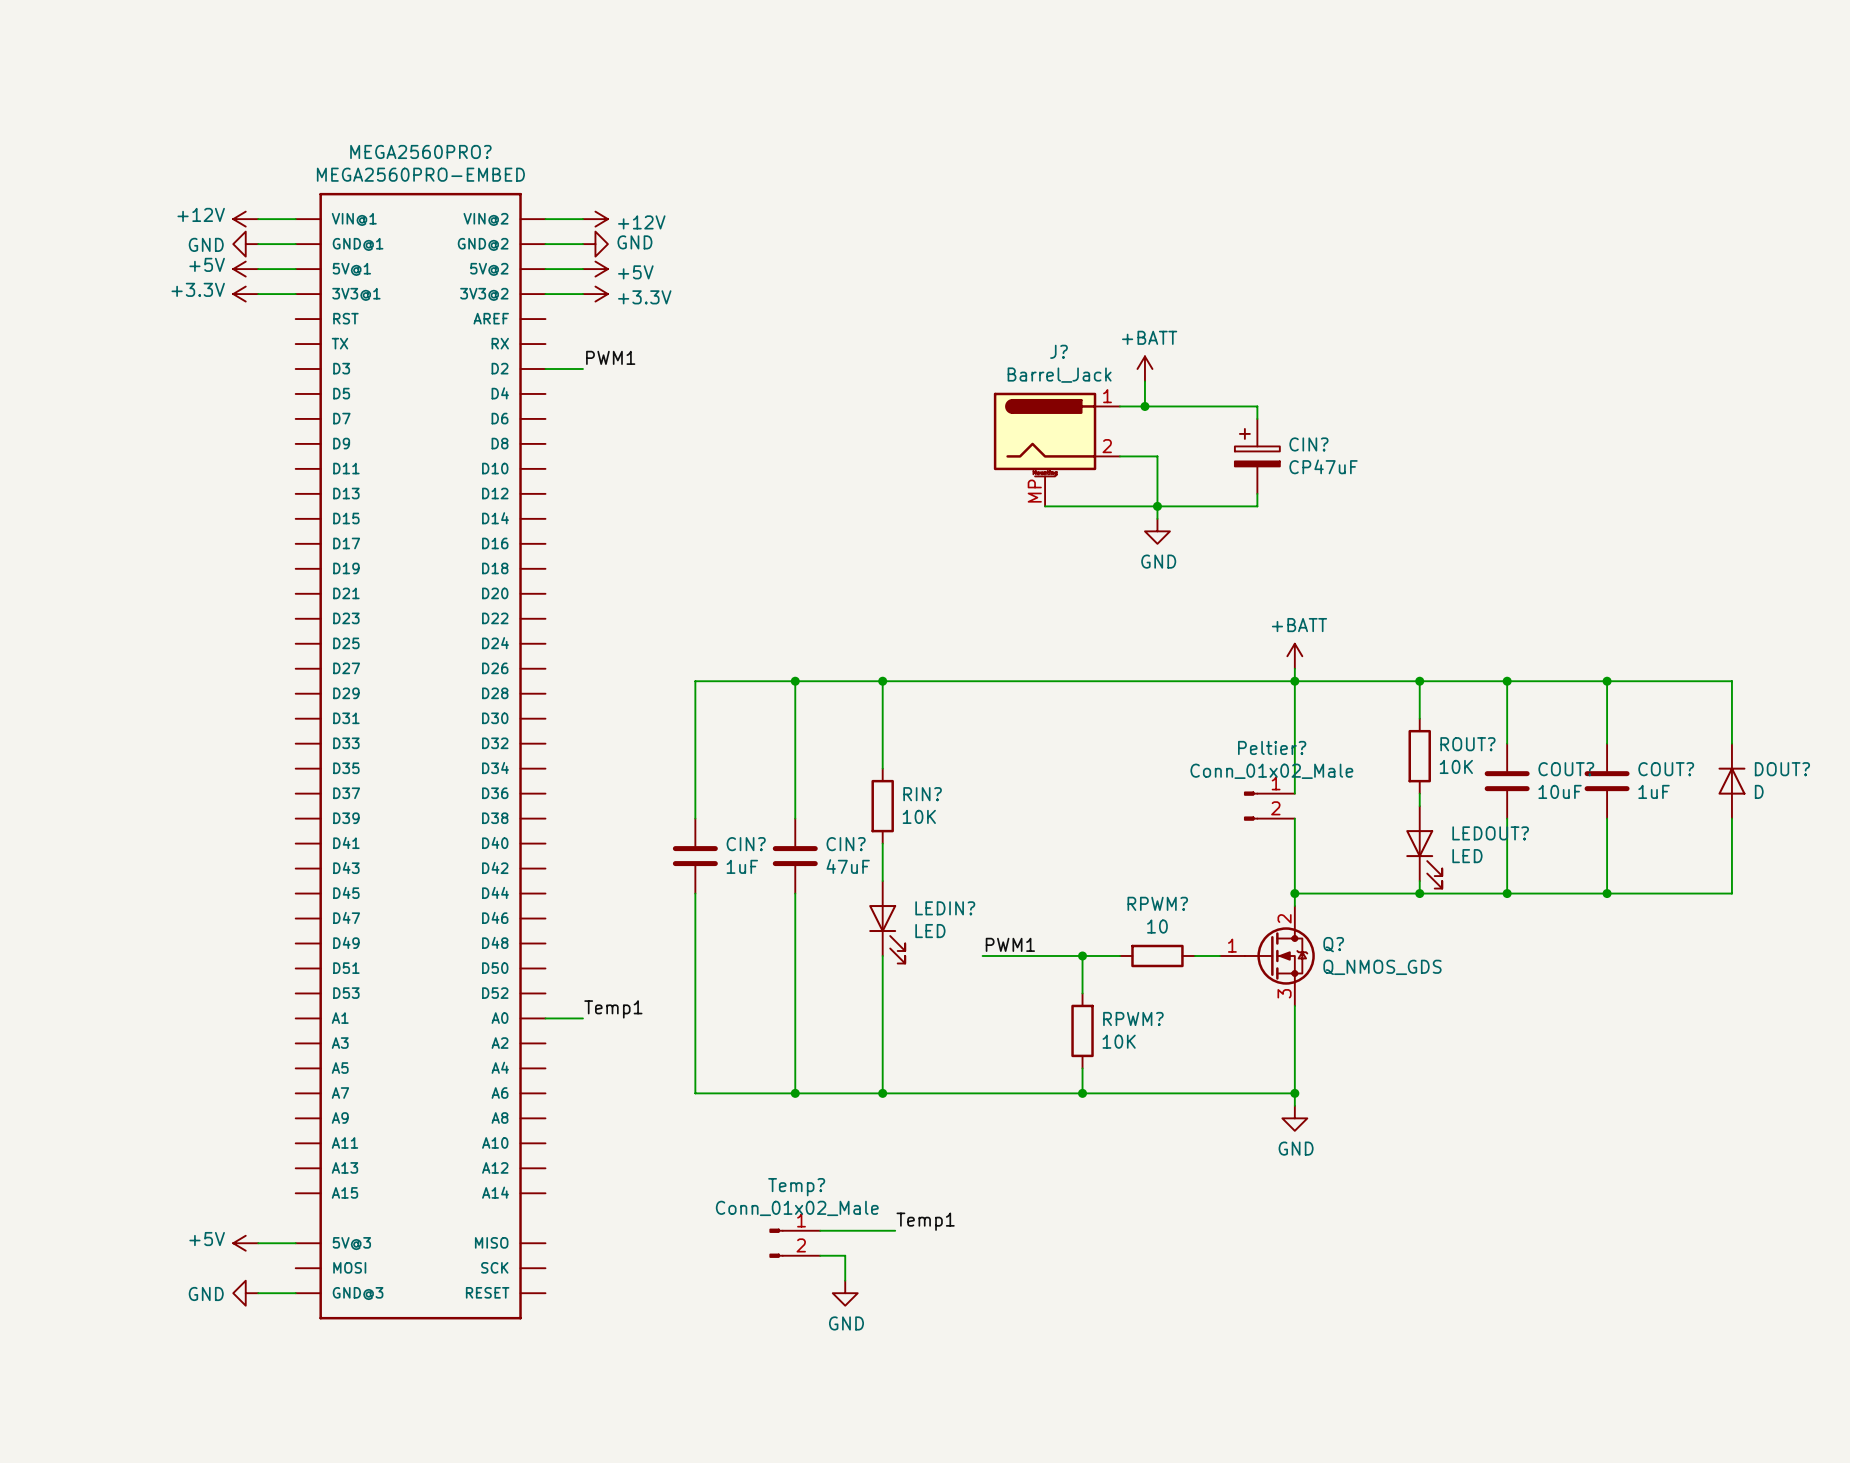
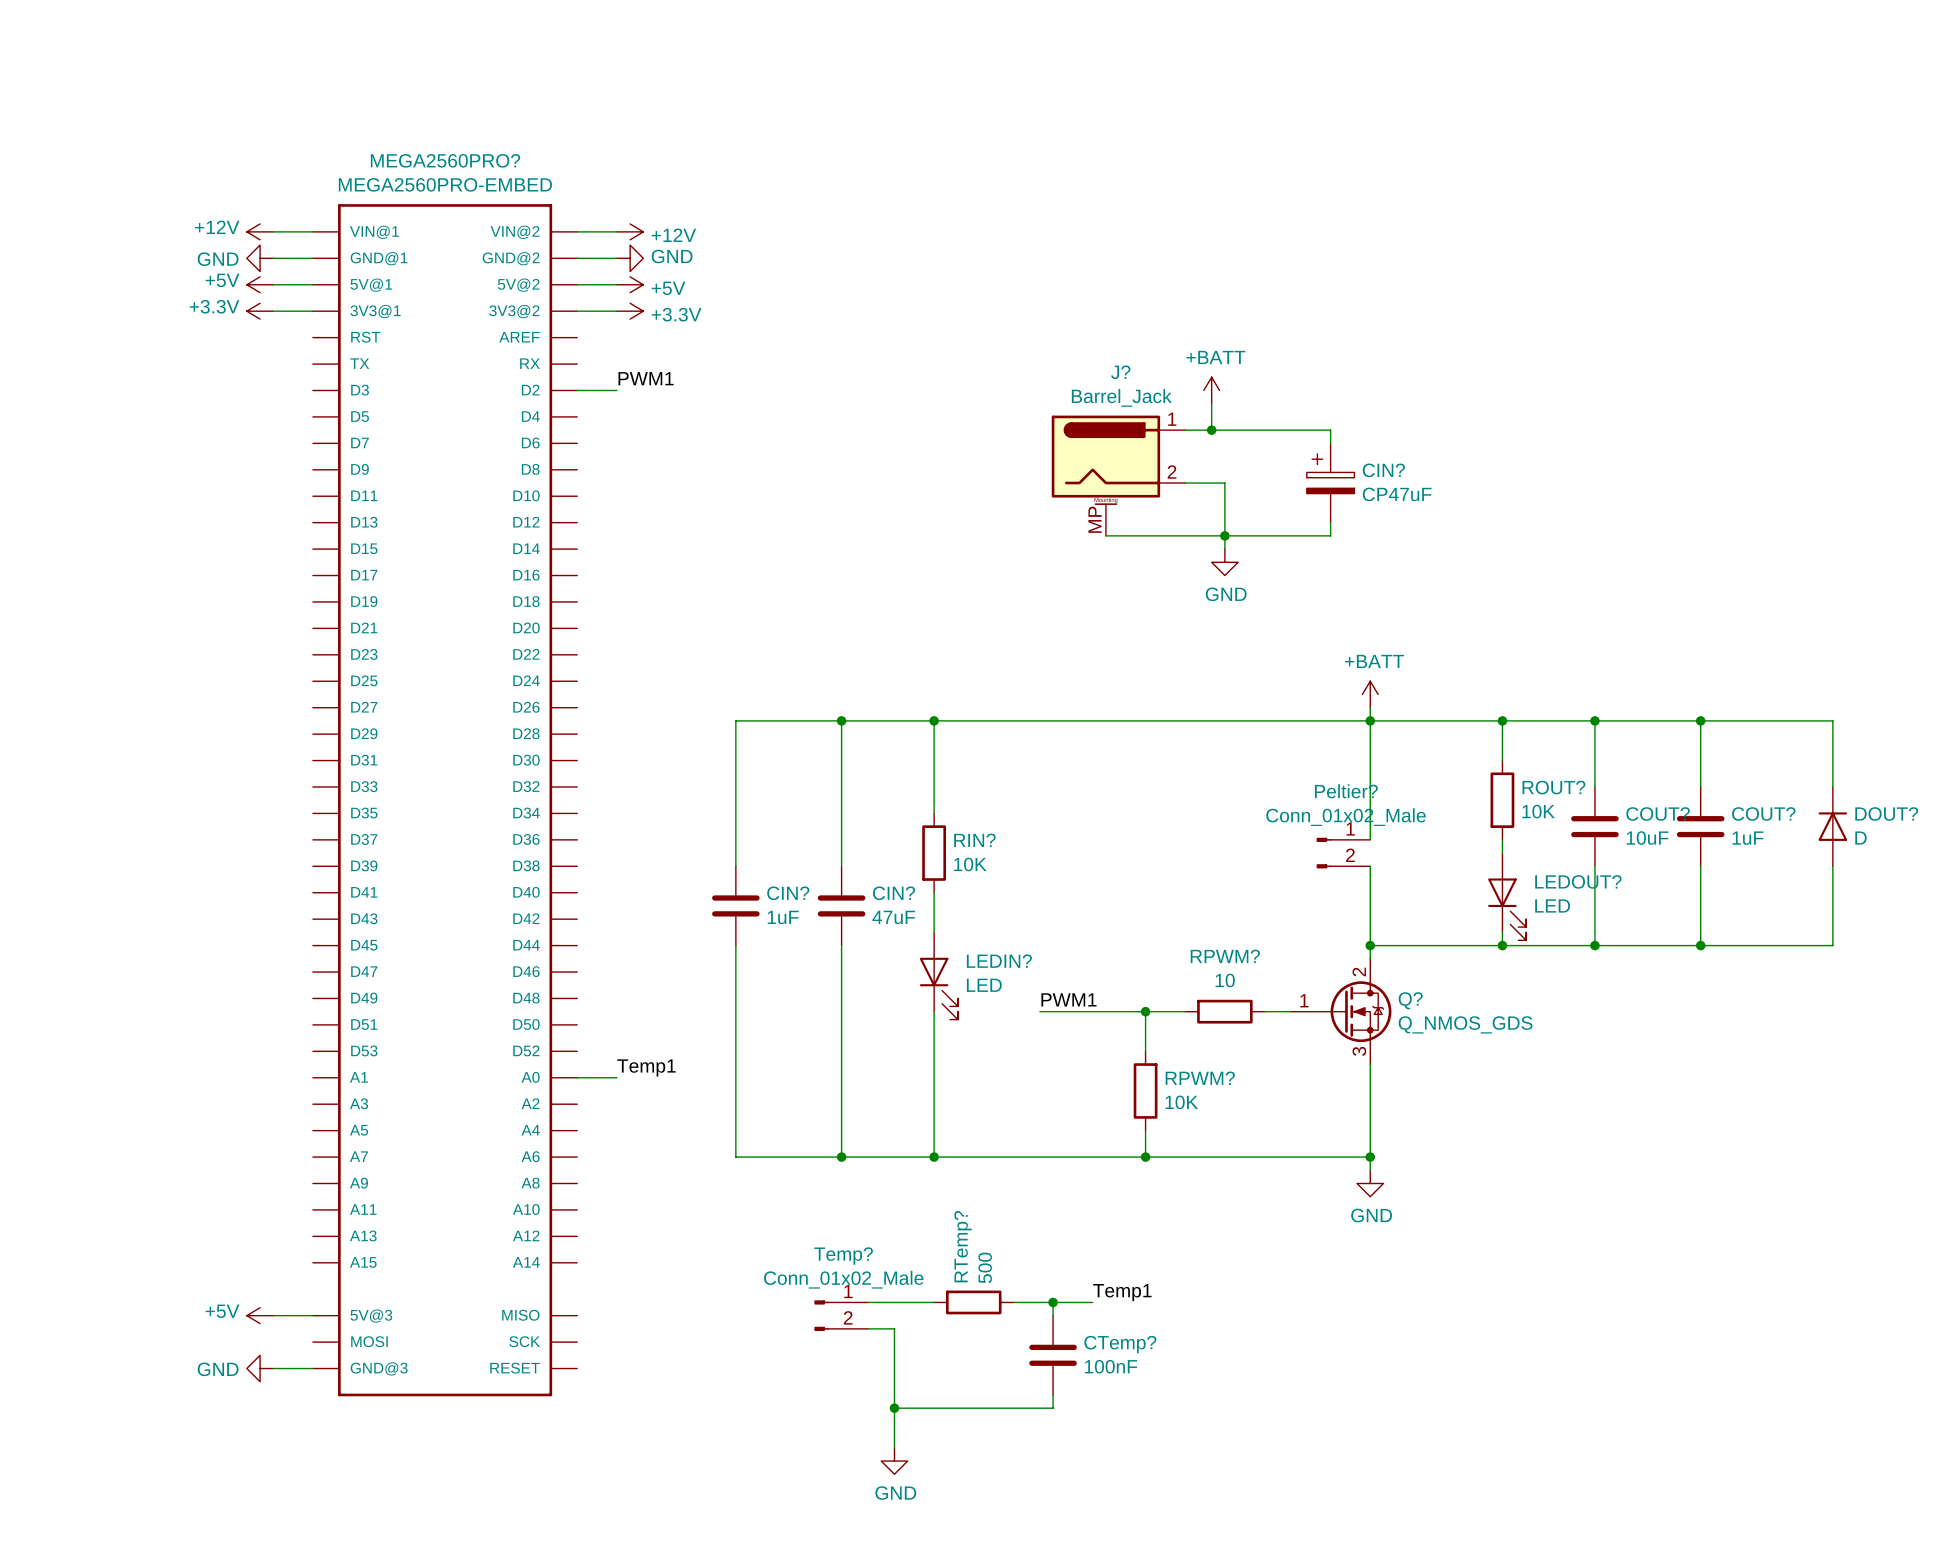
label position: Temp1 (925, 1221) -> Temp1 (1122, 1292)
RTemp?: none -> 500 (973, 1302)
wire: none -> (1013, 1302) (1092, 1302)
wire: none -> (1053, 1302) (1053, 1315)
junction: none -> (1053, 1302)
wire: none -> (894, 1355) (894, 1447)
CTemp?: none -> 100nF (1053, 1355)
power symbol position: GND (845, 1293) -> GND (894, 1461)
wire: none -> (1053, 1394) (1053, 1408) (894, 1408)
junction: none -> (894, 1408)

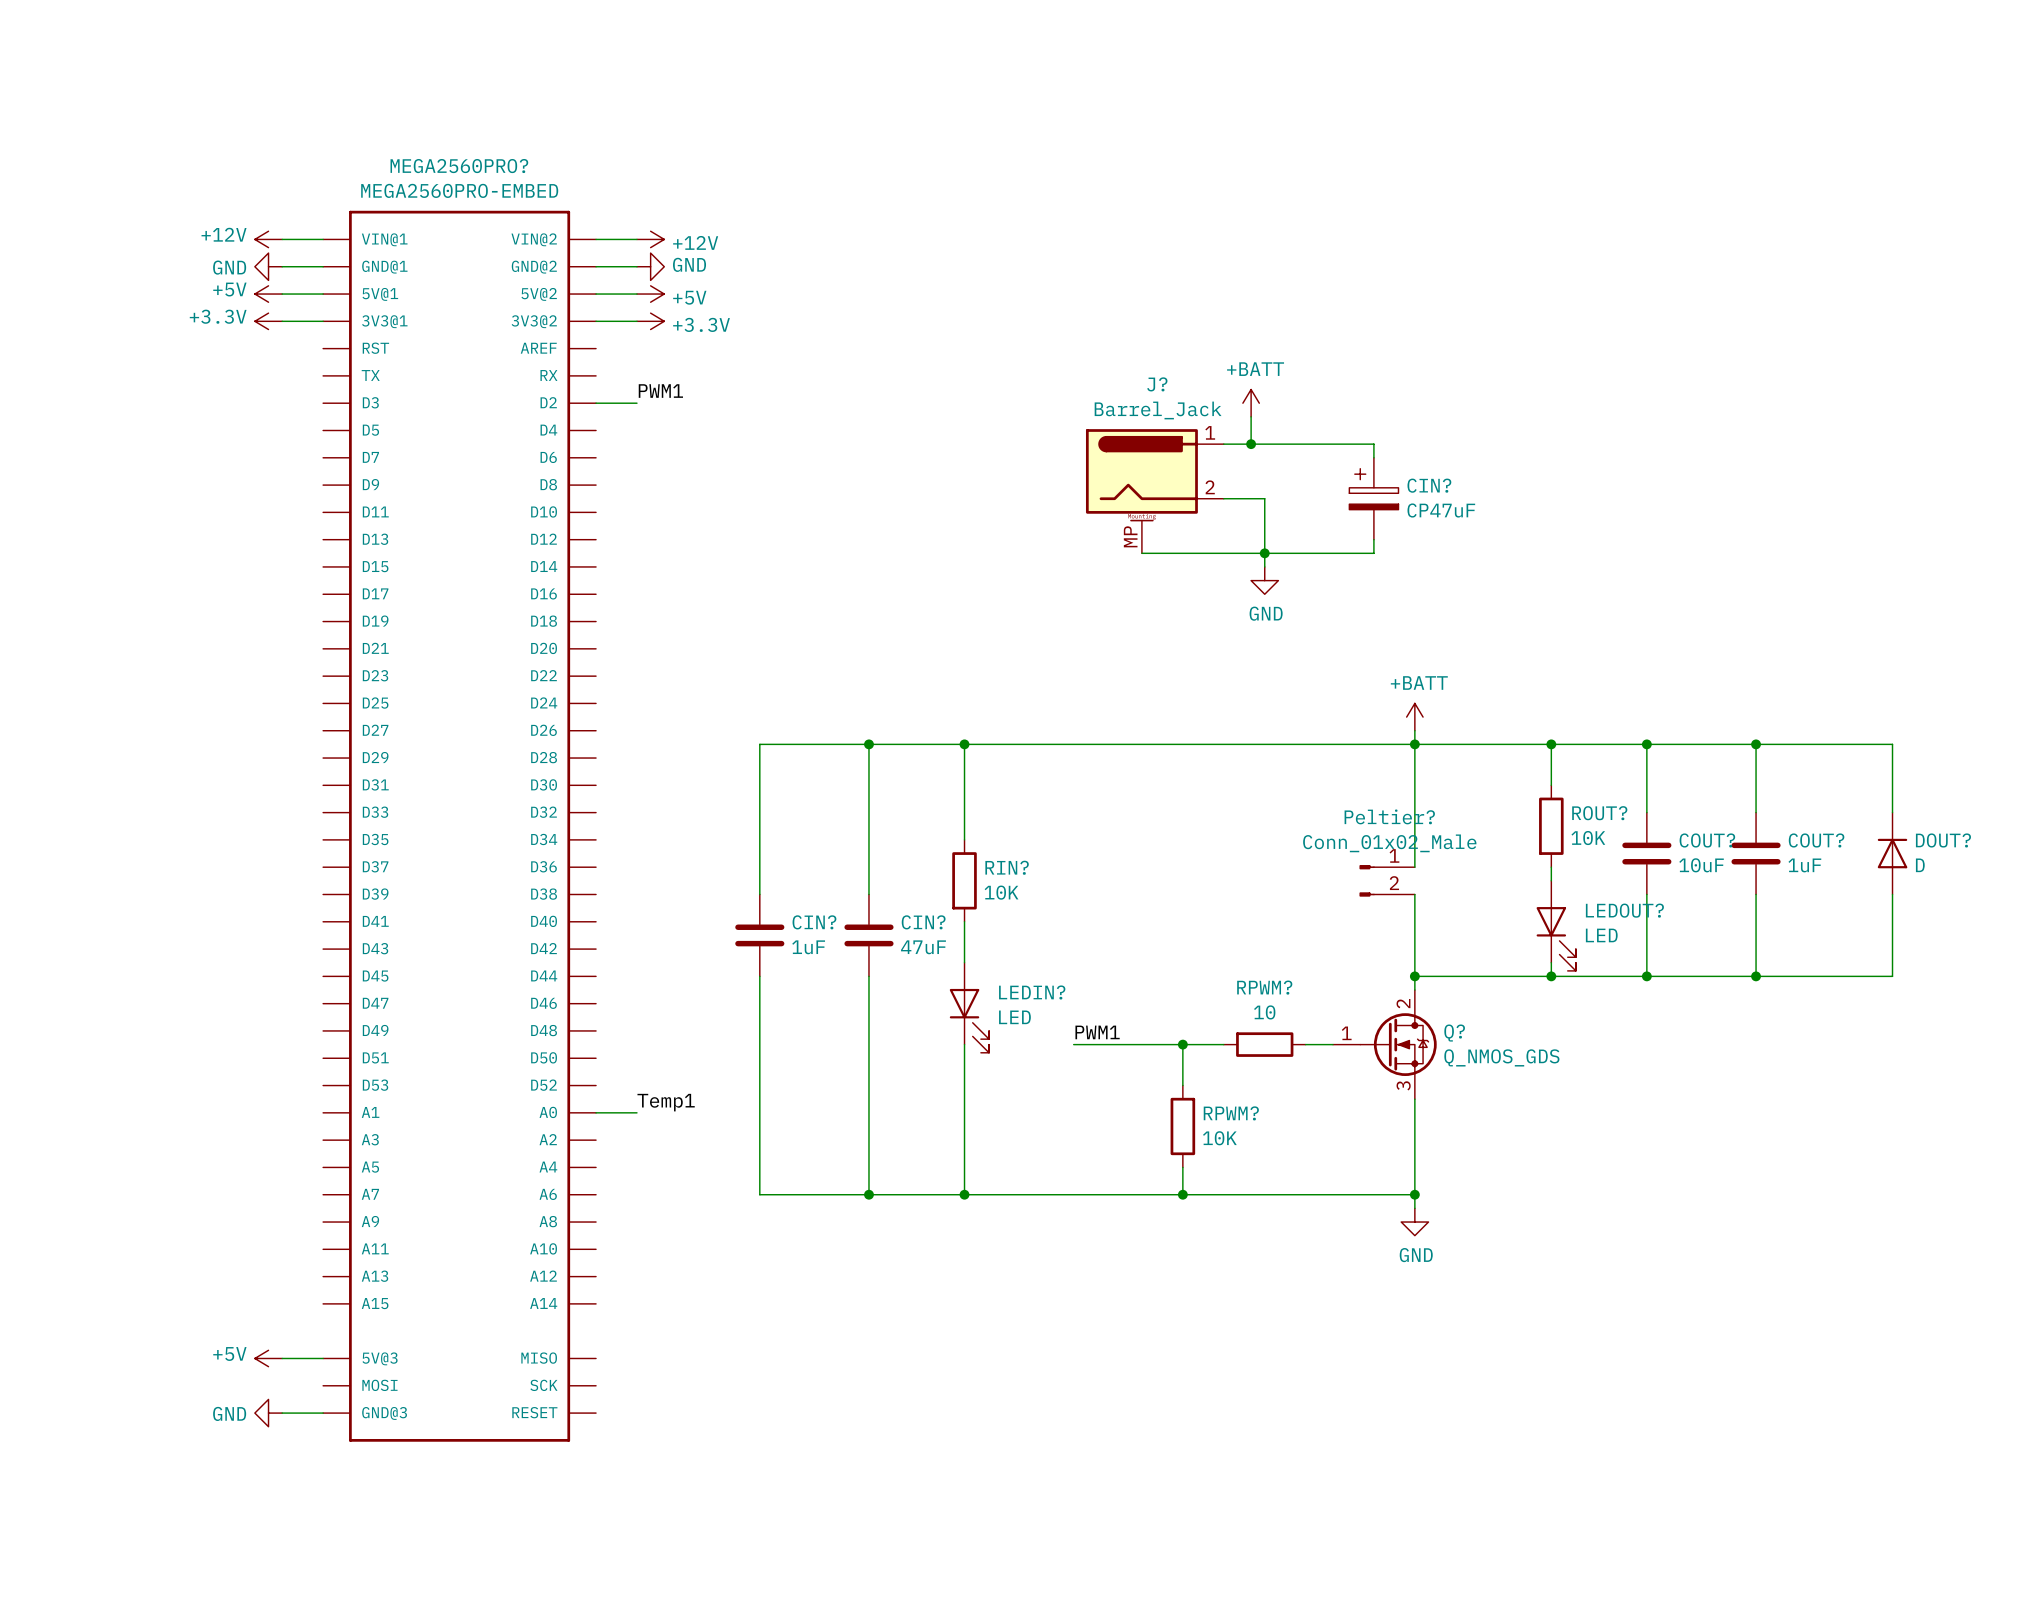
label: Temp1 (1122, 1292) -> none
wire: (868, 1302) (934, 1302) -> none
RTemp?: 500 (973, 1302) -> none
wire: (1013, 1302) (1092, 1302) -> none
wire: (1053, 1302) (1053, 1315) -> none
junction: (1053, 1302) -> none
Temp?: Conn_01x02_Male (841, 1315) -> none
wire: (868, 1328) (894, 1328) (894, 1447) -> none
CTemp?: 100nF (1053, 1355) -> none
wire: (1053, 1394) (1053, 1408) (894, 1408) -> none
junction: (894, 1408) -> none
power symbol: GND (894, 1461) -> none

